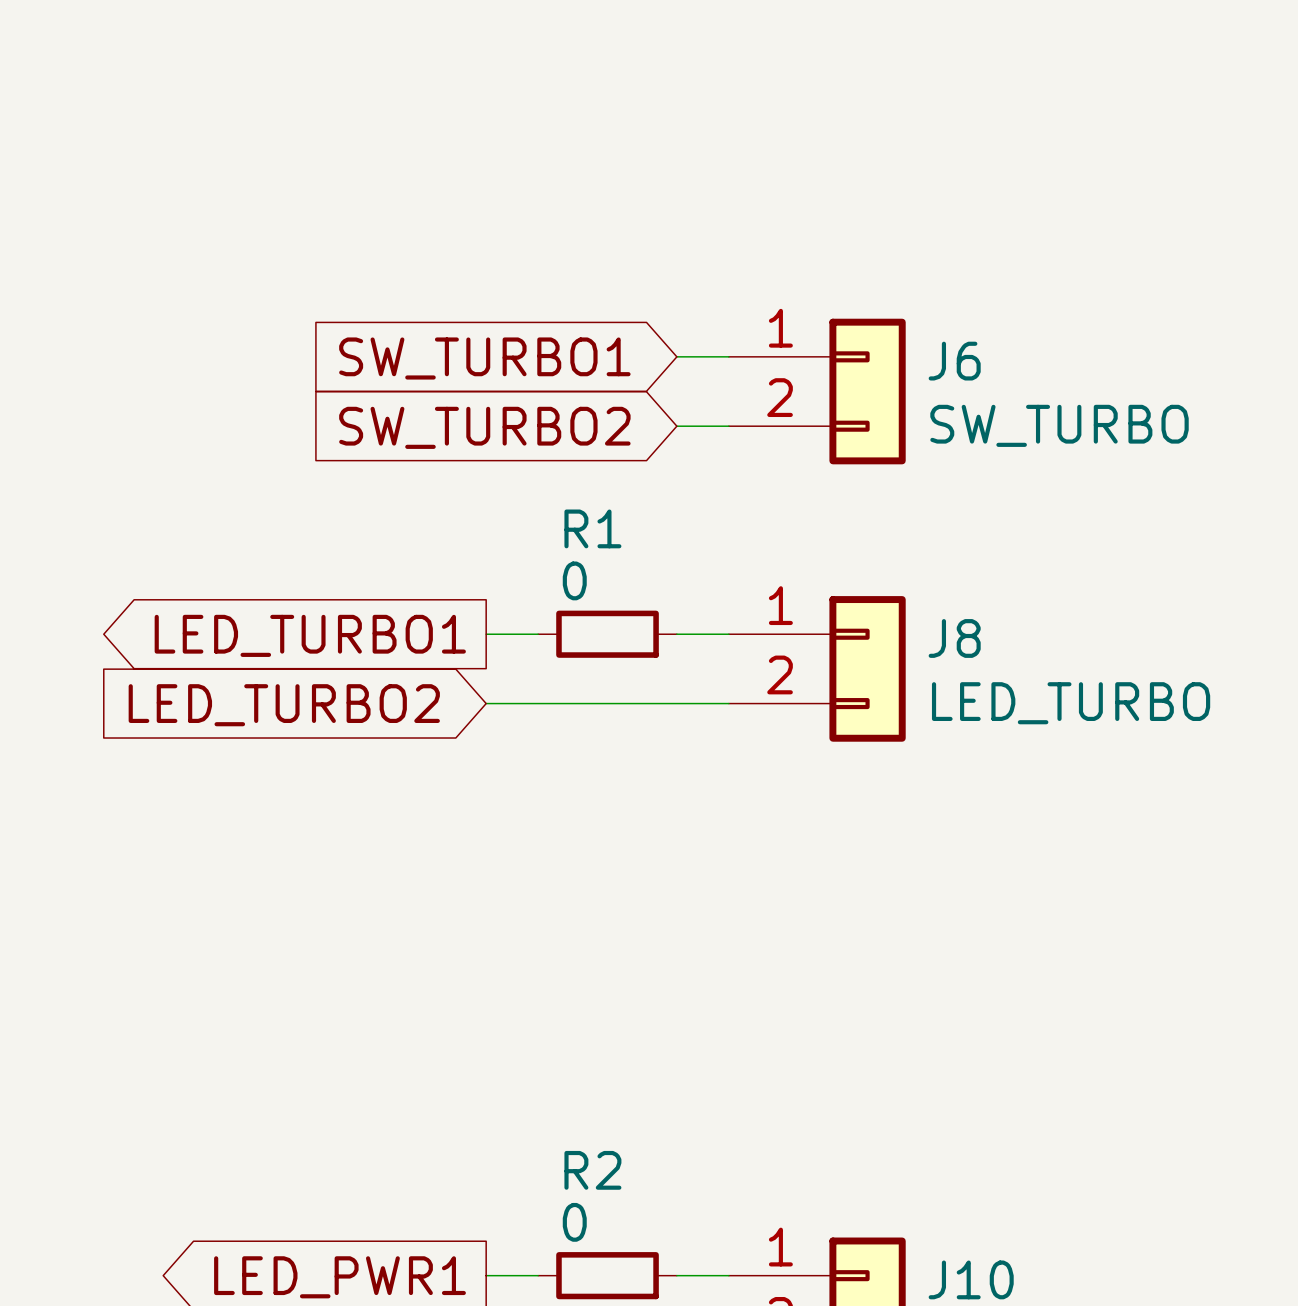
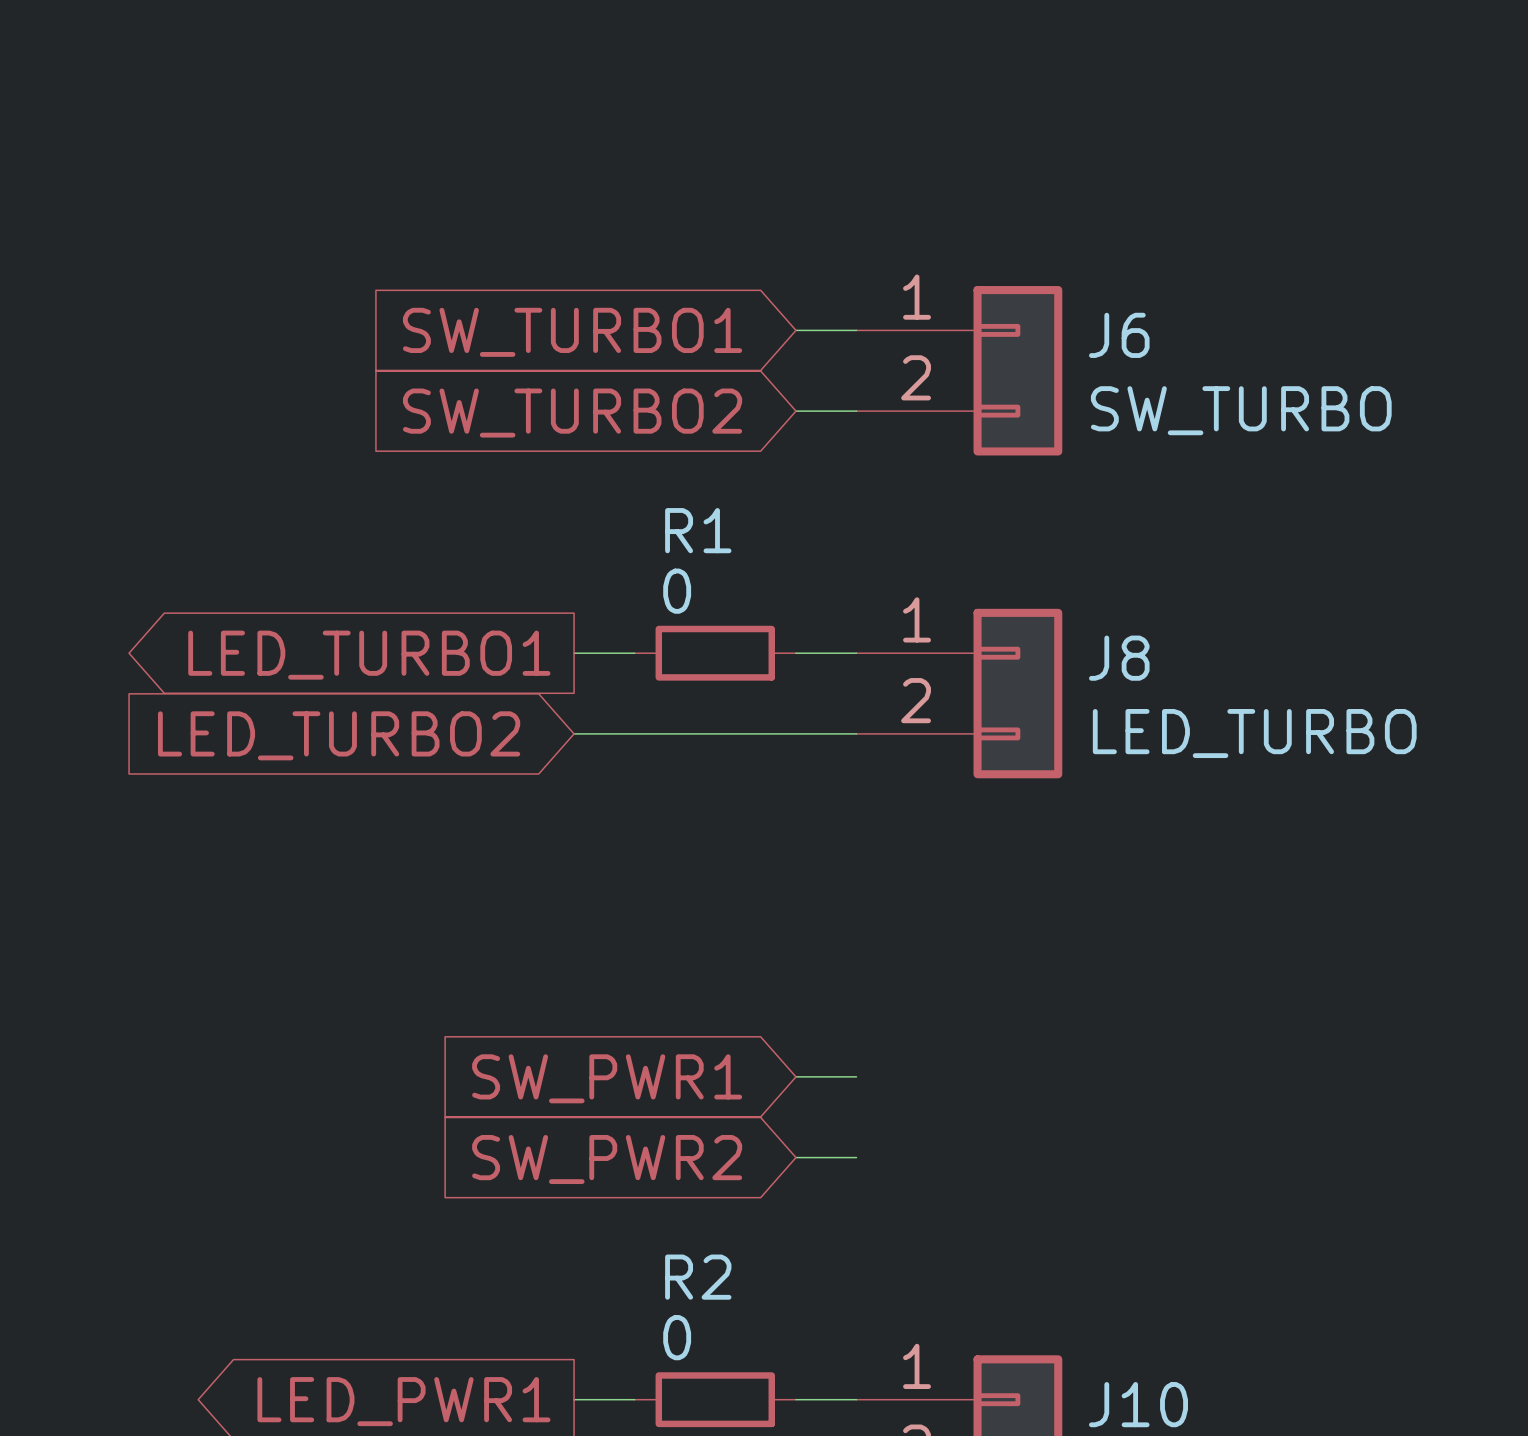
wire: none -> (795, 1076) (856, 1076)
global label: none -> SW_PWR1 (607, 1078)
wire: none -> (795, 1157) (856, 1157)
global label: none -> SW_PWR2 (607, 1159)

